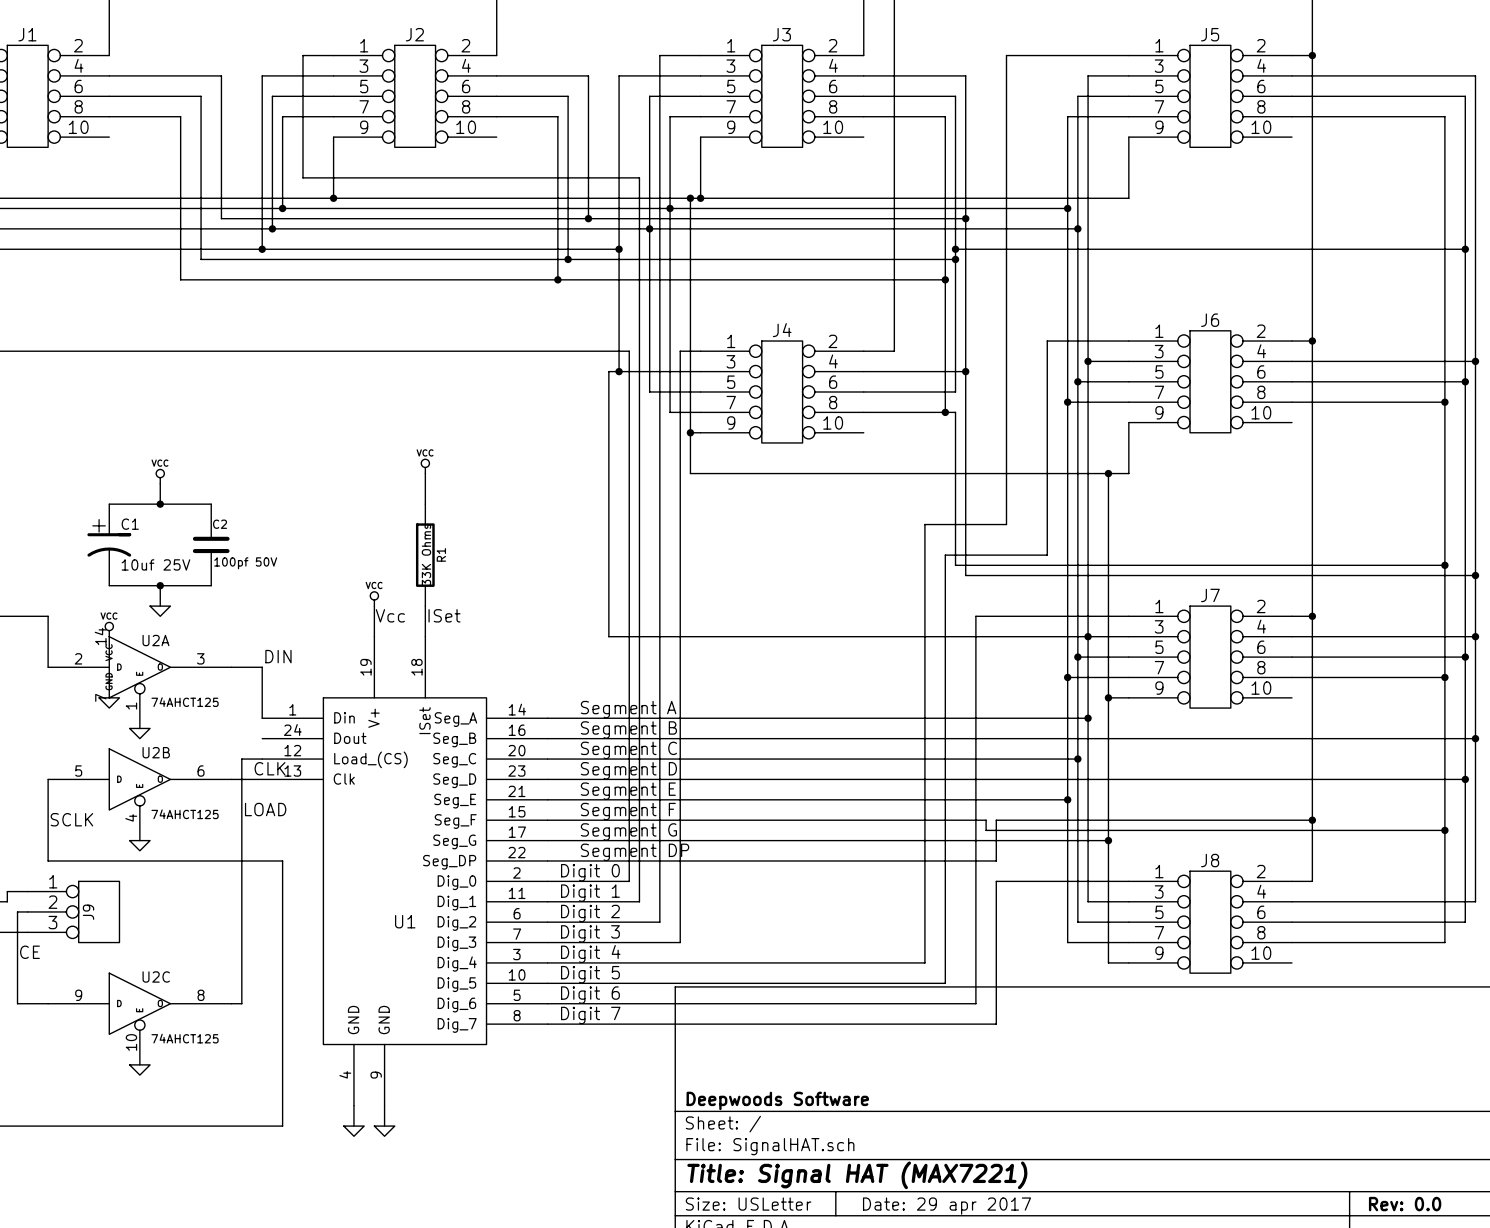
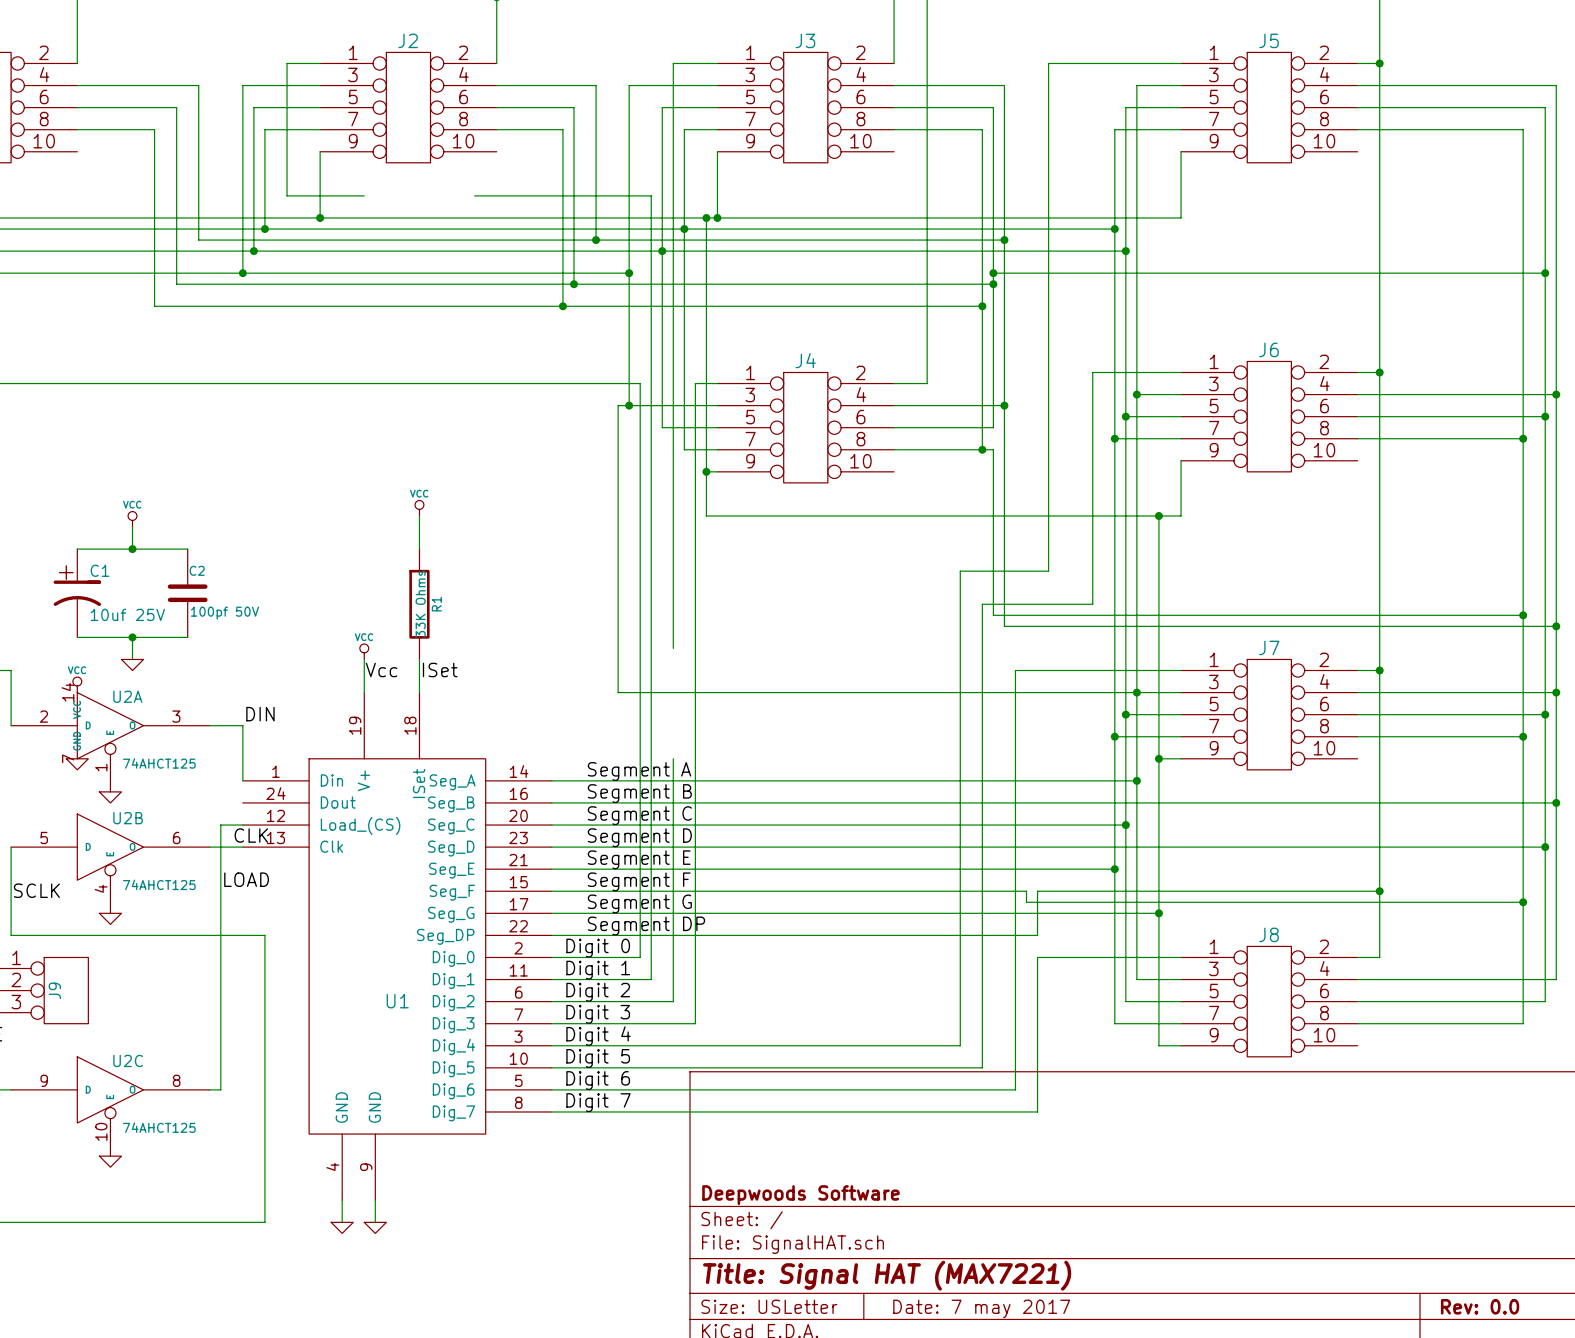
wire: (374, 177) (476, 177) -> none
wire: (659, 595) (659, 697) -> none
title block: Date: 29 apr 2017 (947, 1206) -> Date: 7 may 2017 (981, 1308)

